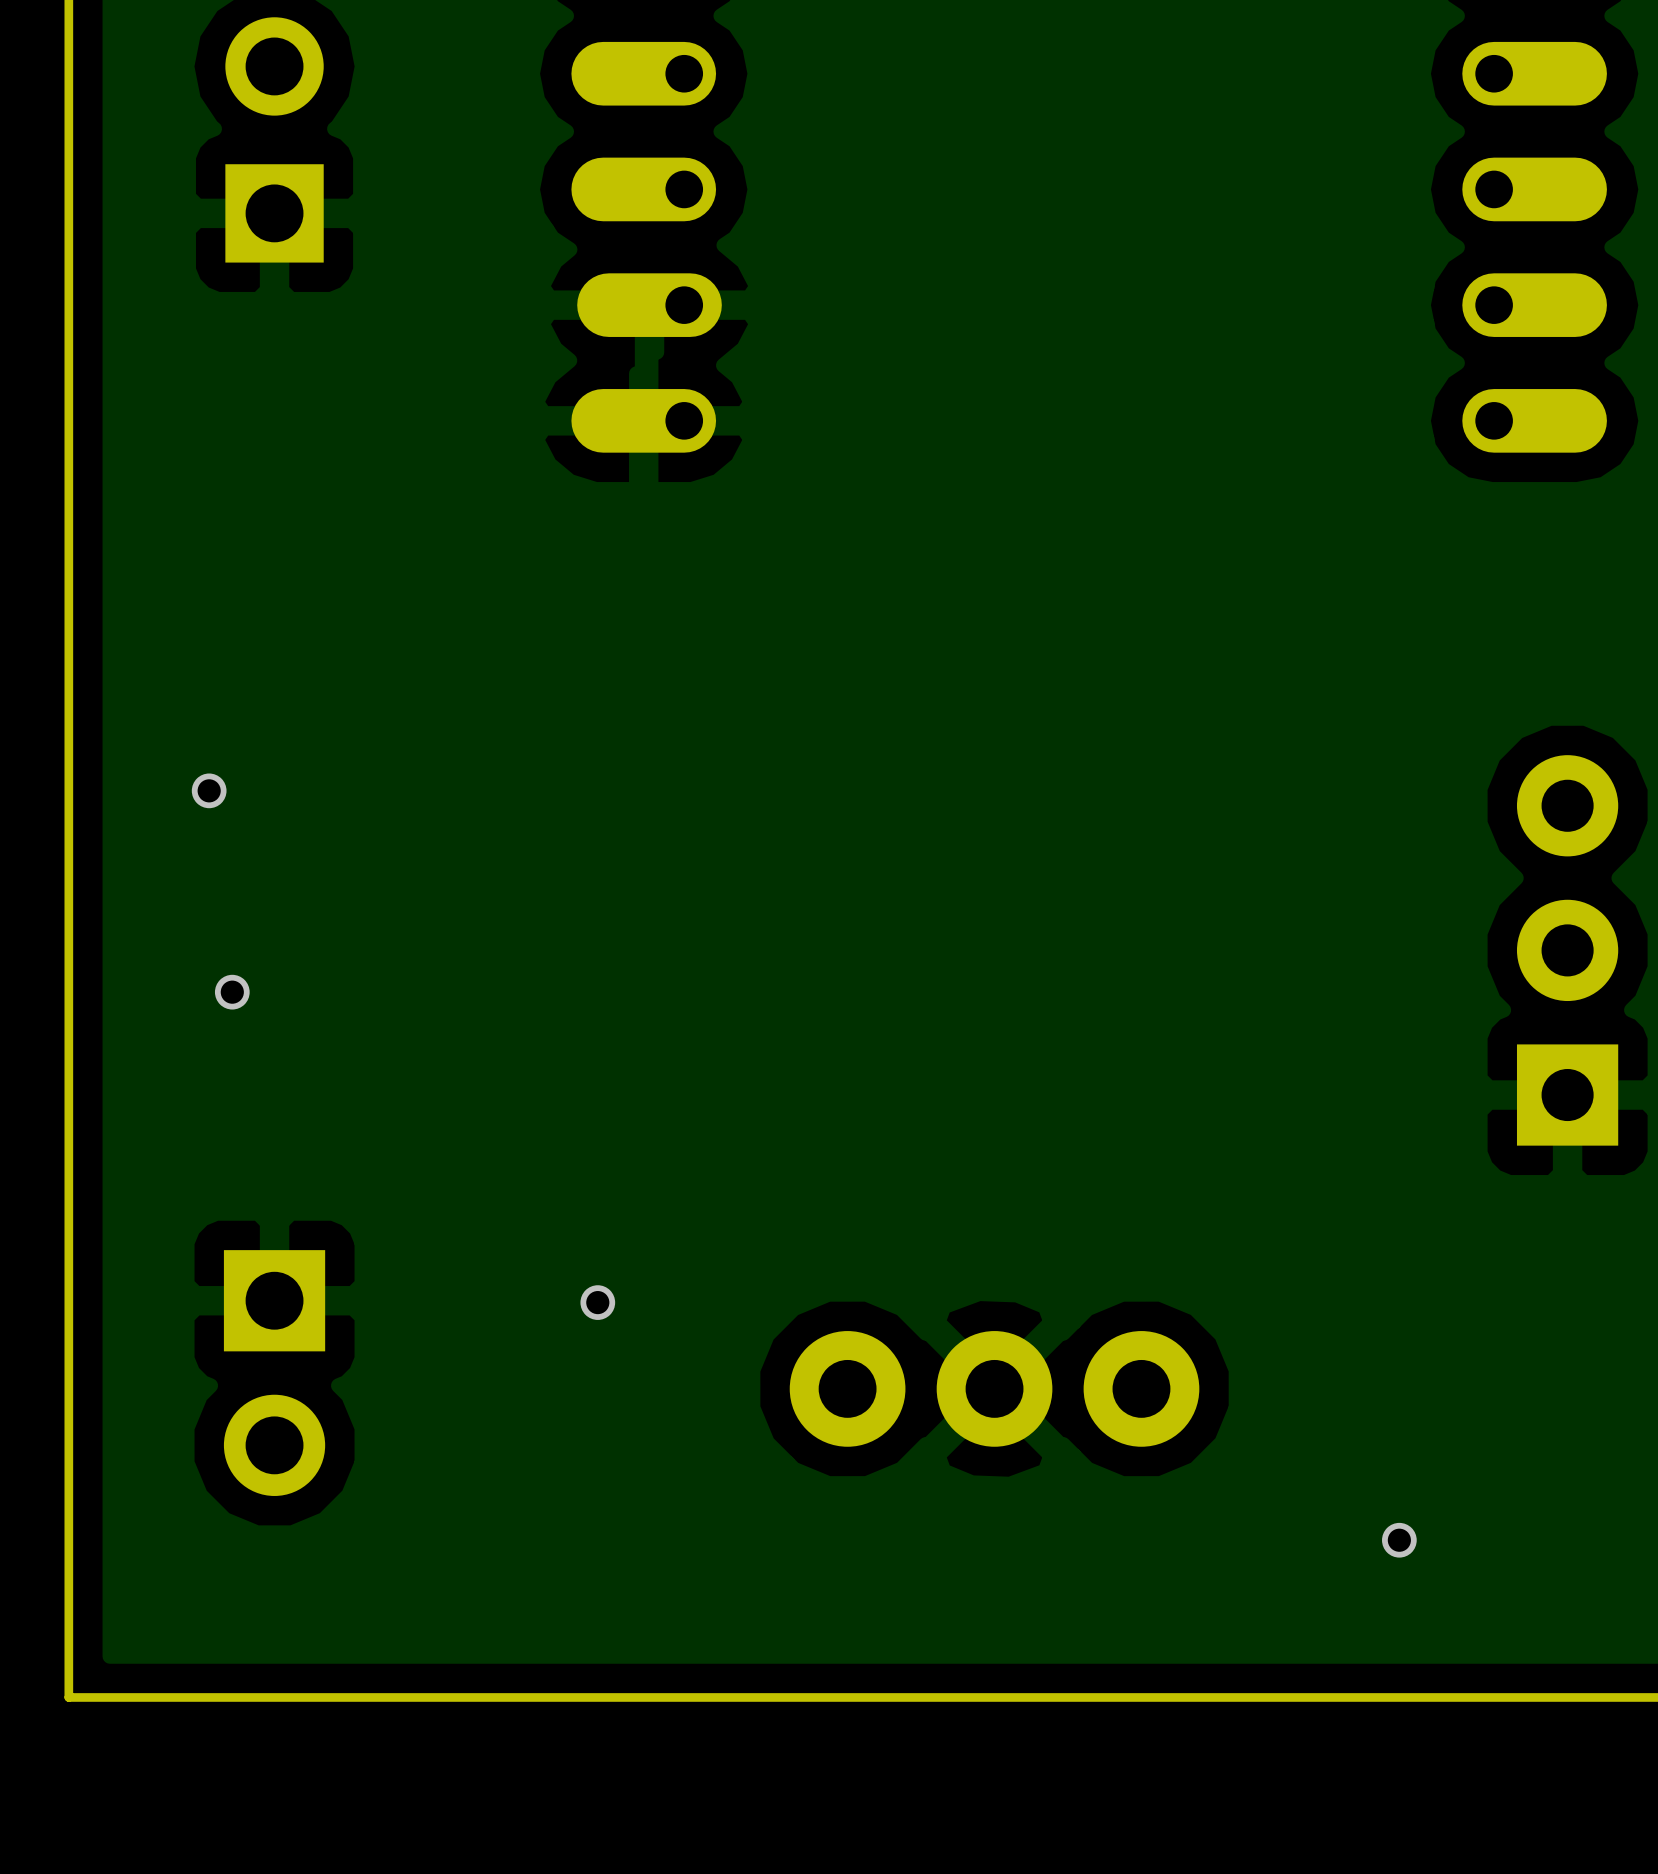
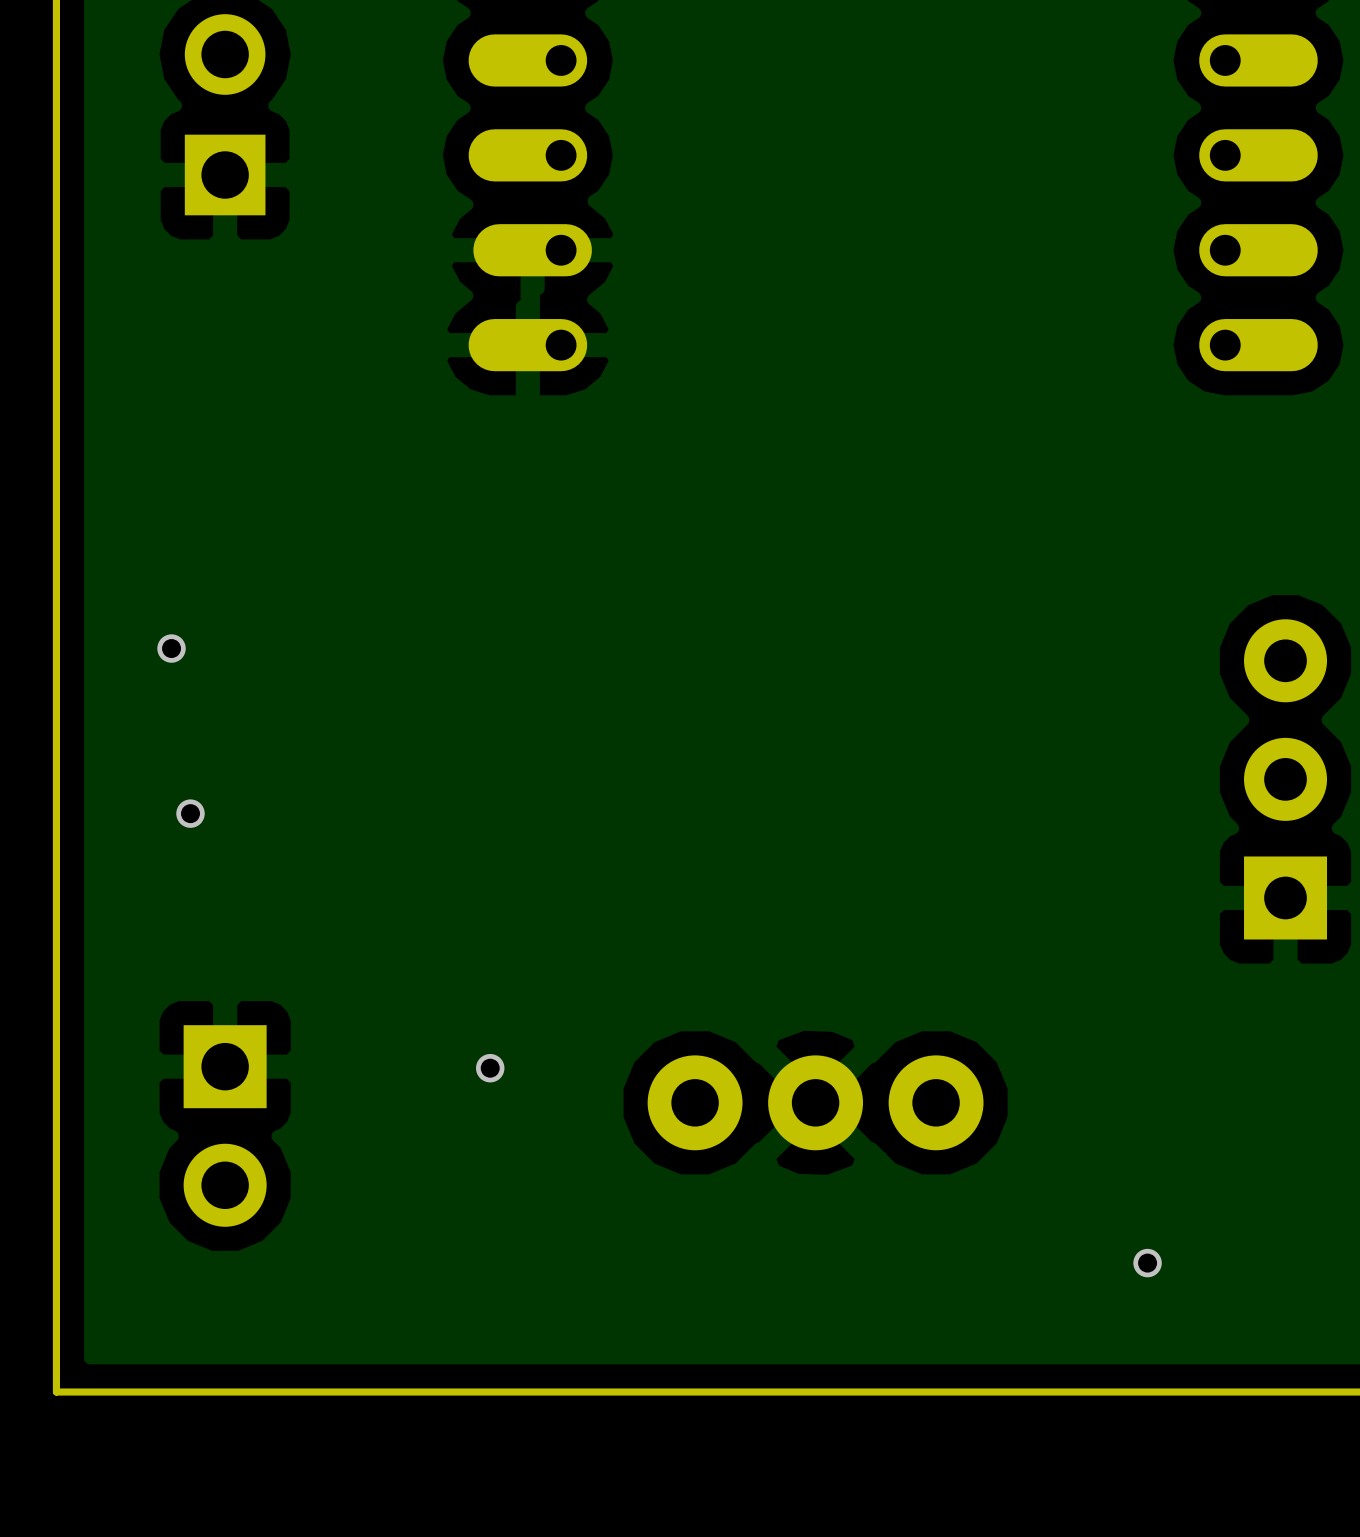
part position: (994, 1388) -> (815, 1102)

